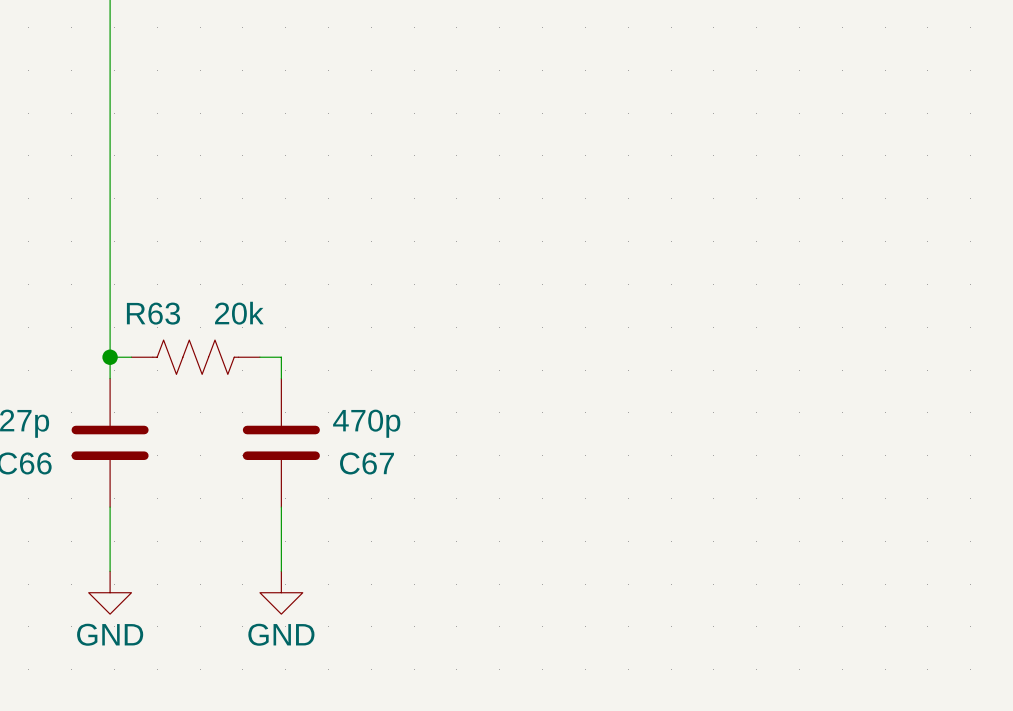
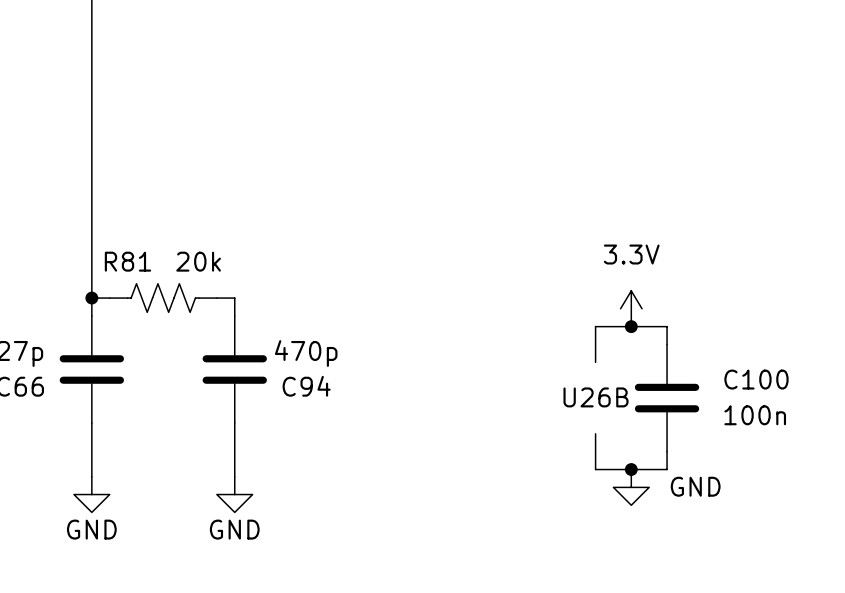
R63 name: R63 (153, 313) -> R81 (128, 261)
power symbol: none -> 3.3V (631, 308)
wire: none -> (595, 326) (667, 326) (667, 344)
junction: none -> (631, 326)
C67 name: C67 (367, 463) -> C94 (306, 386)
U26B: none -> (595, 398)
C100: none -> 100n (667, 398)
wire: none -> (667, 451) (667, 469) (595, 469)
junction: none -> (631, 469)
power symbol: none -> GND (631, 487)

